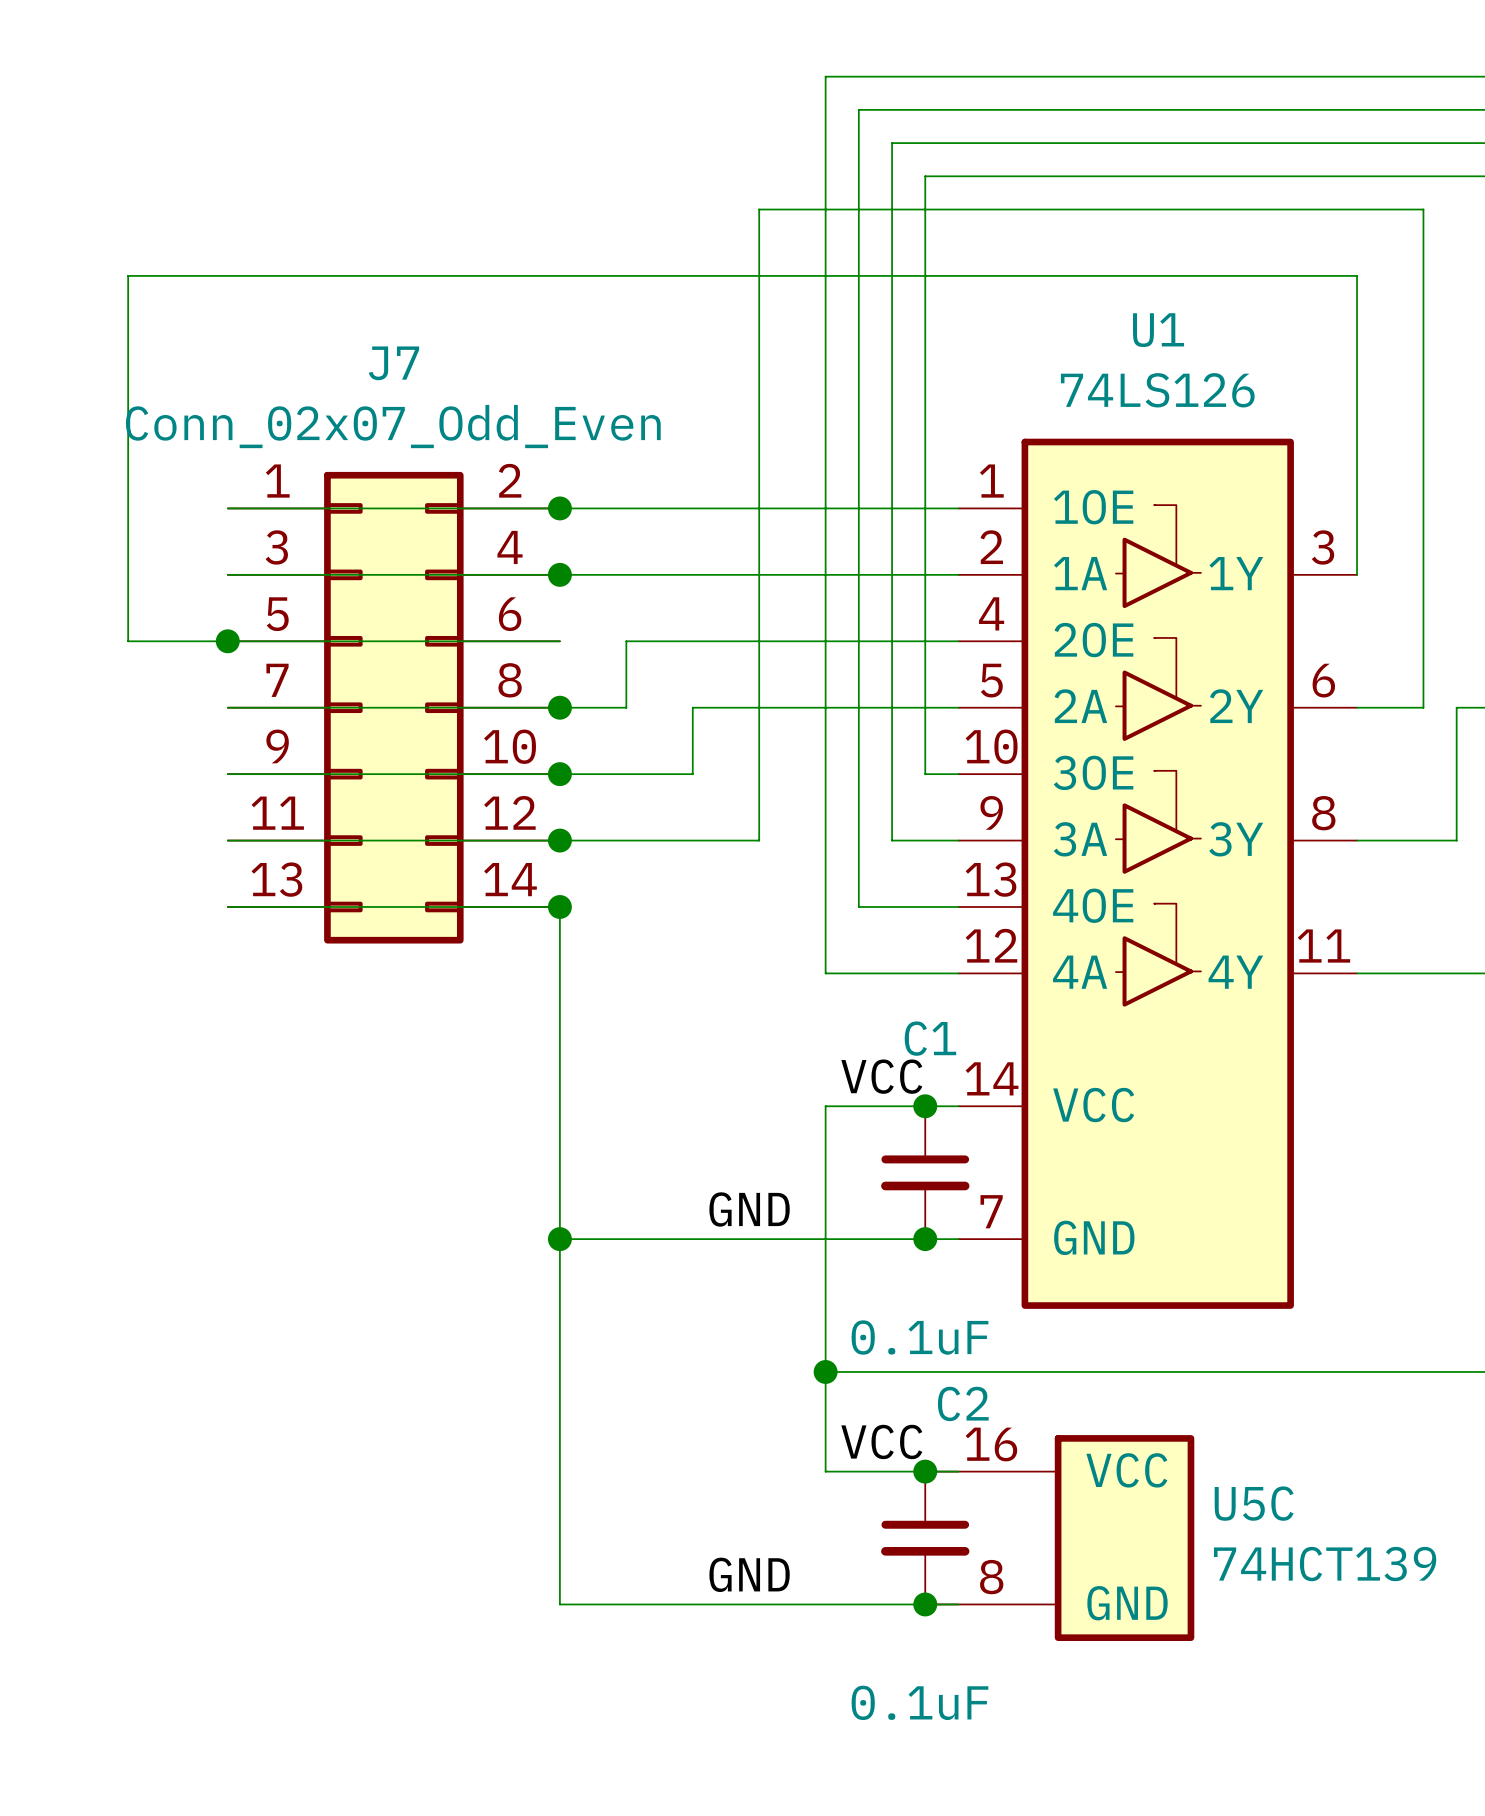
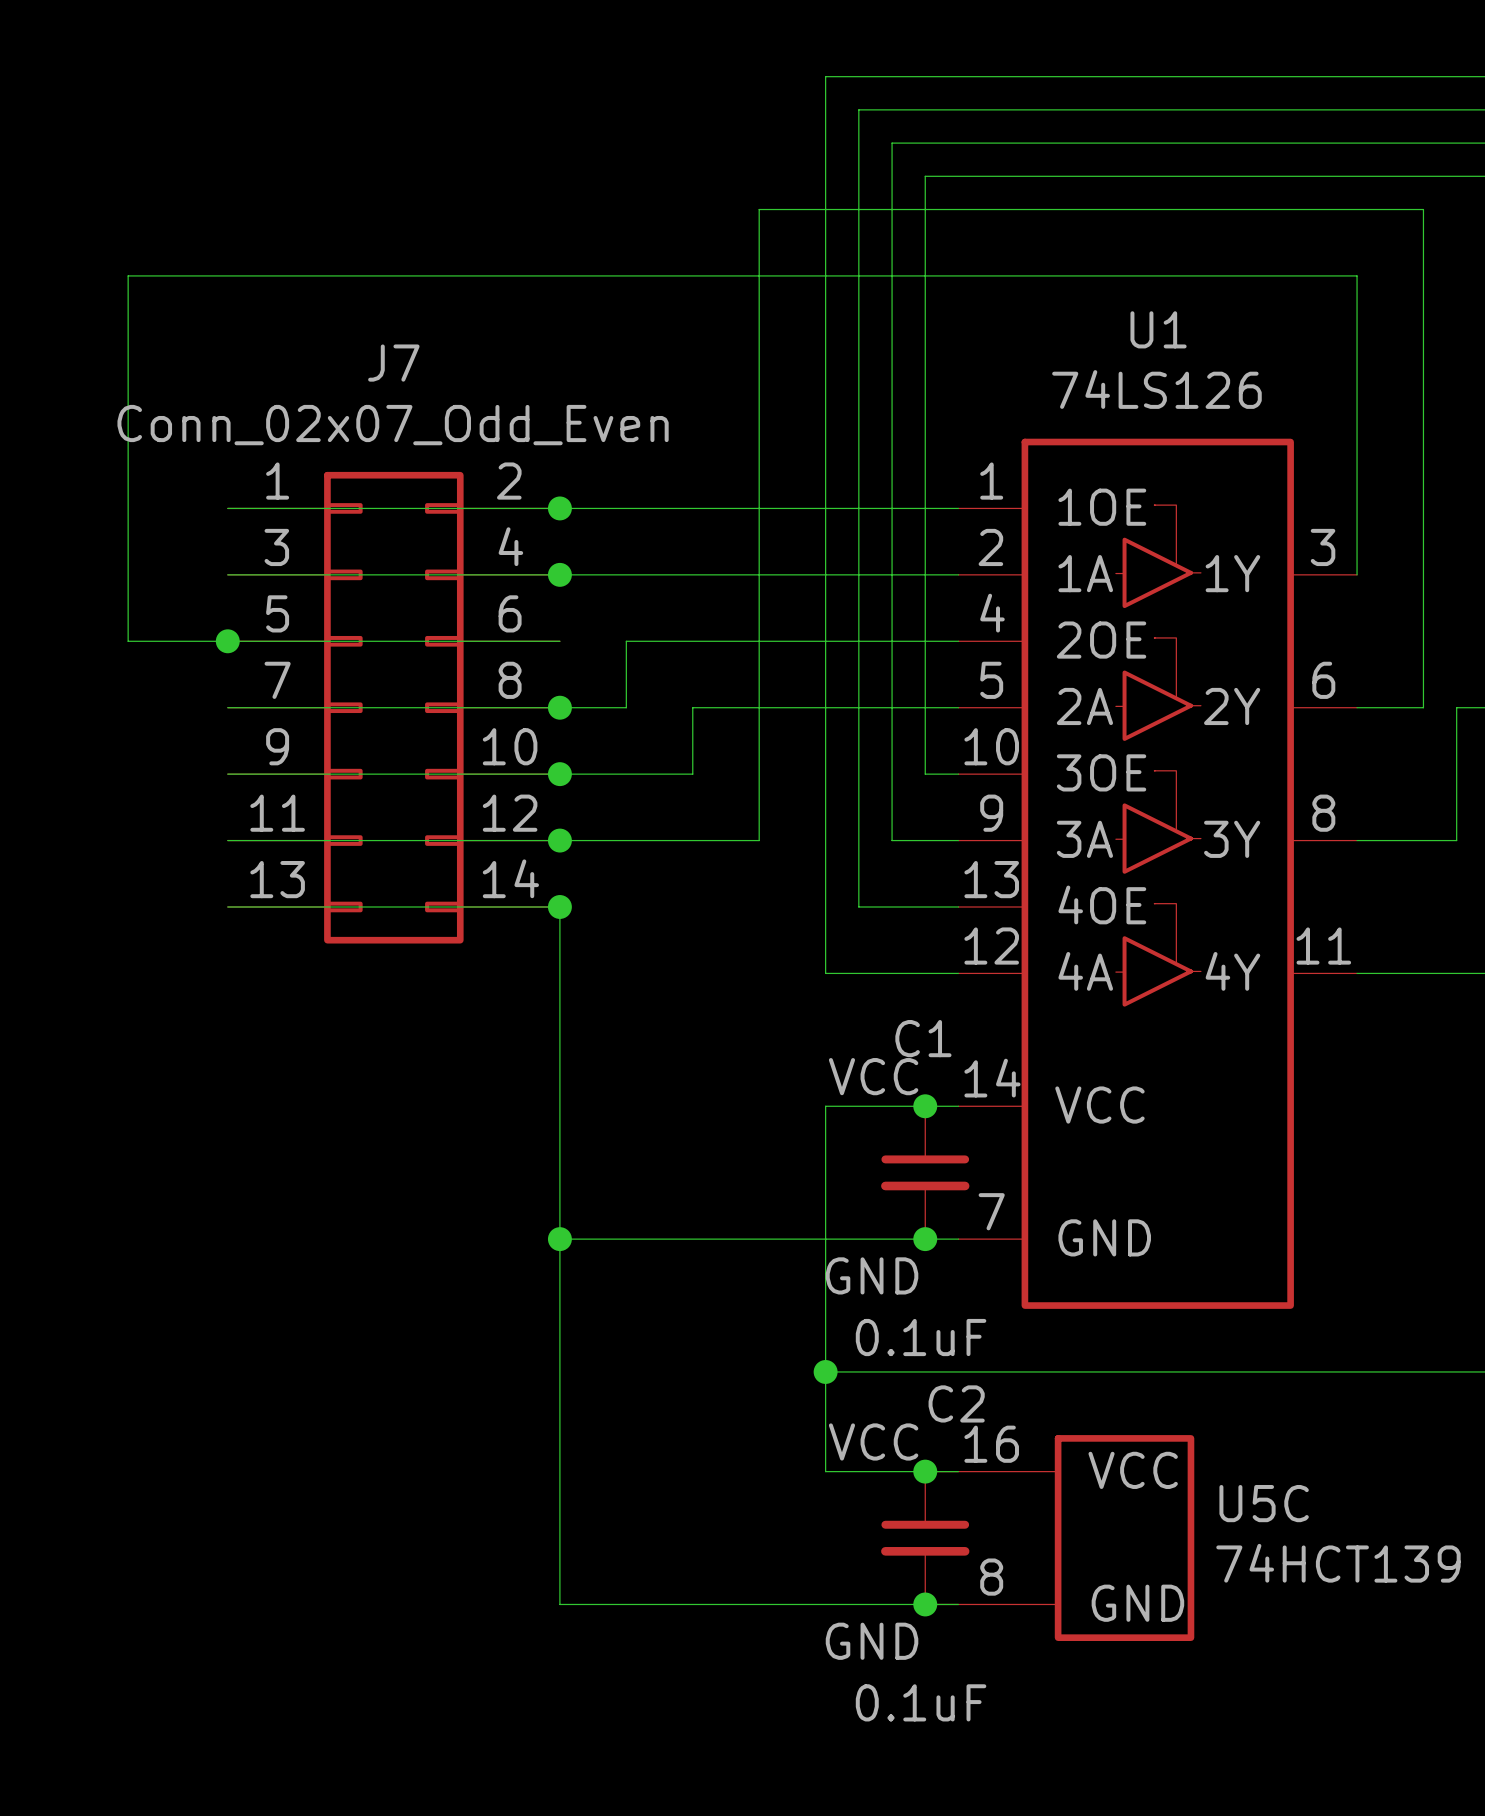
label position: GND (749, 1209) -> GND (872, 1275)
label position: GND (749, 1574) -> GND (872, 1641)

